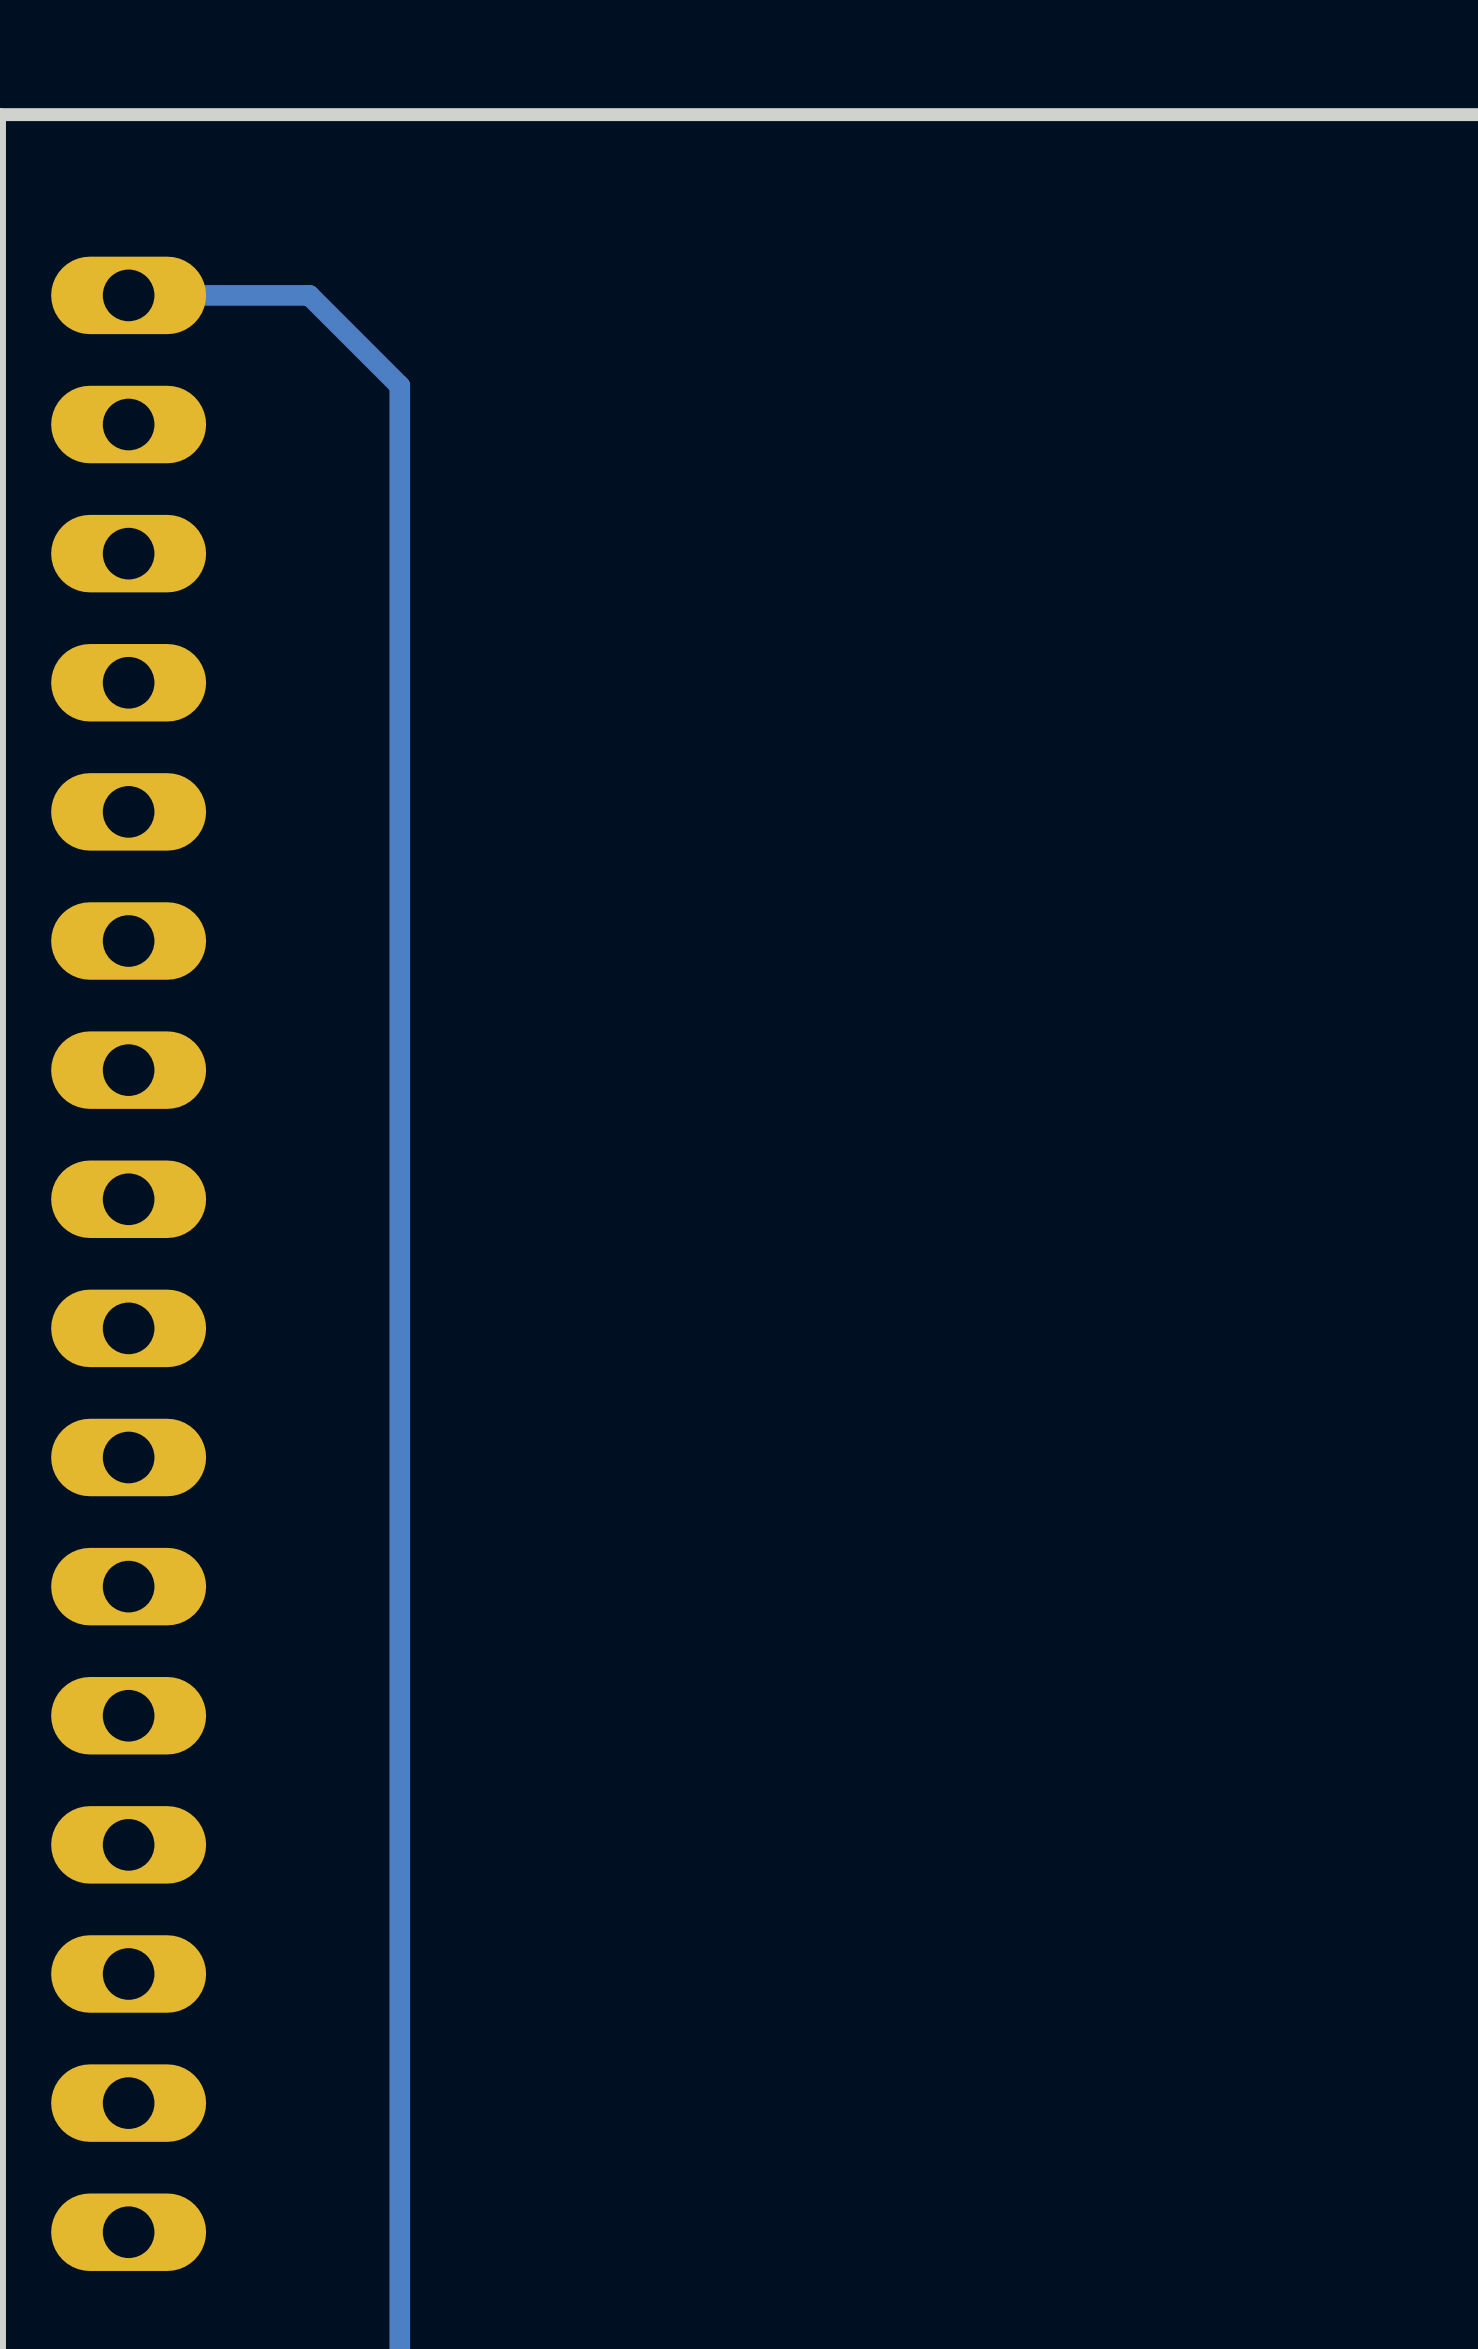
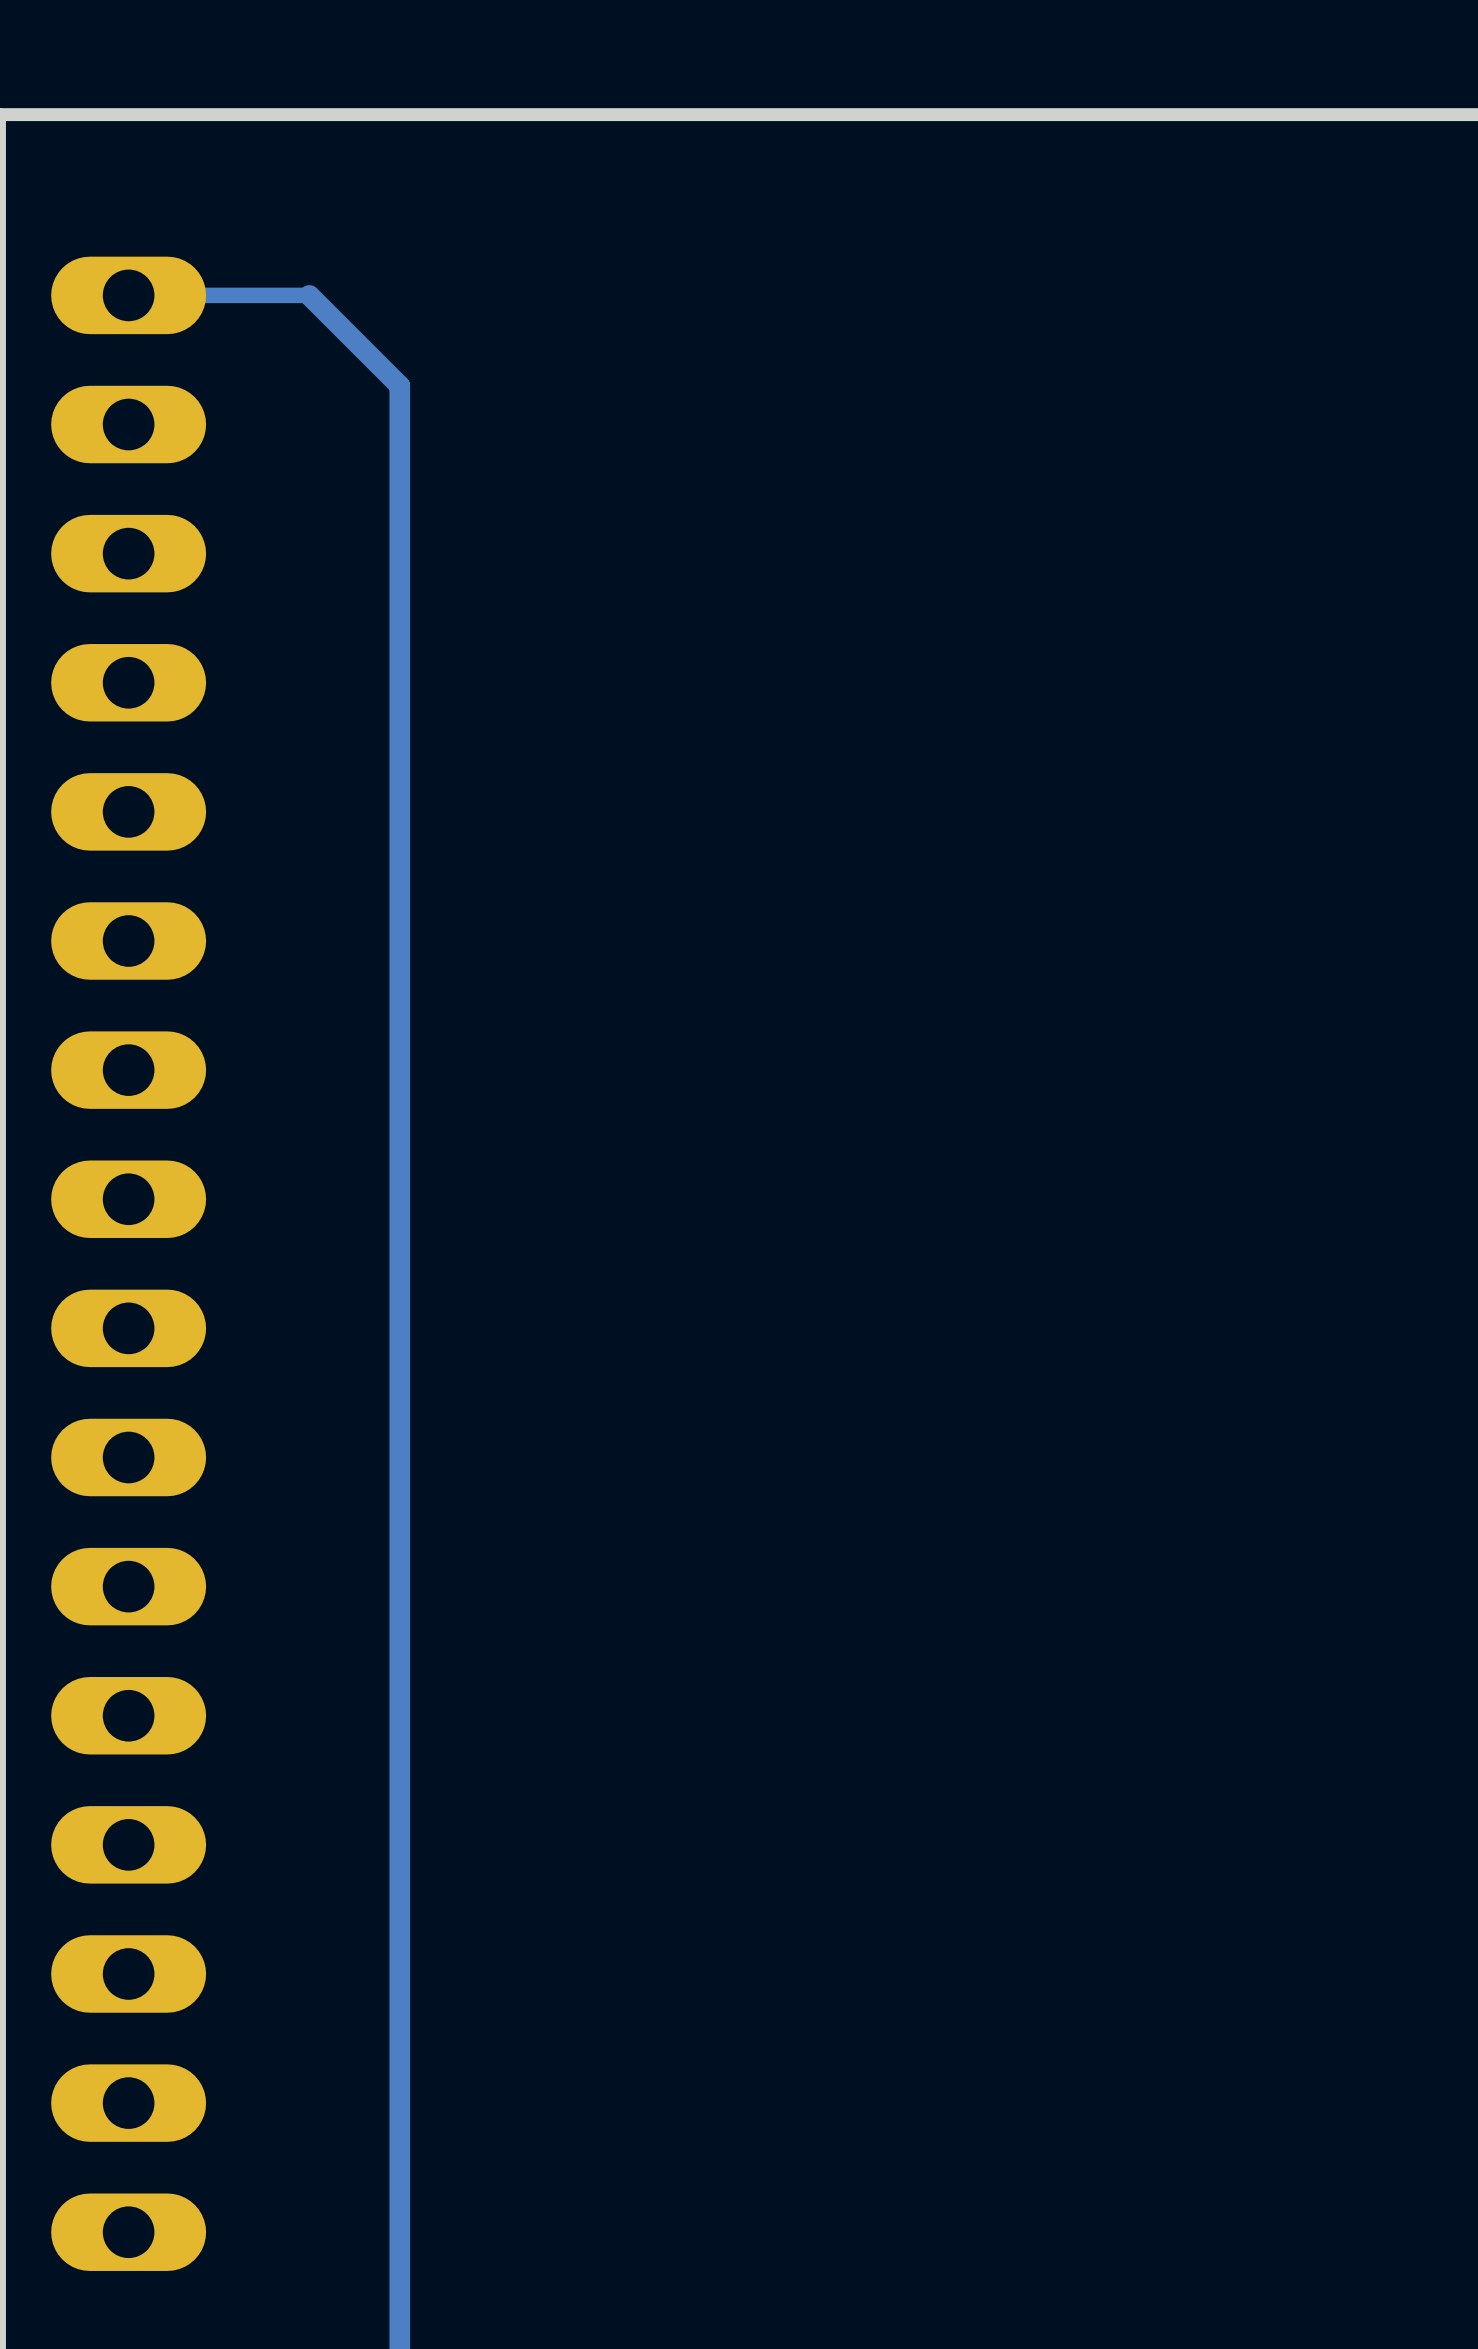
track width: thick (309, 295) (128, 295) -> thin (309, 295) (128, 295)

